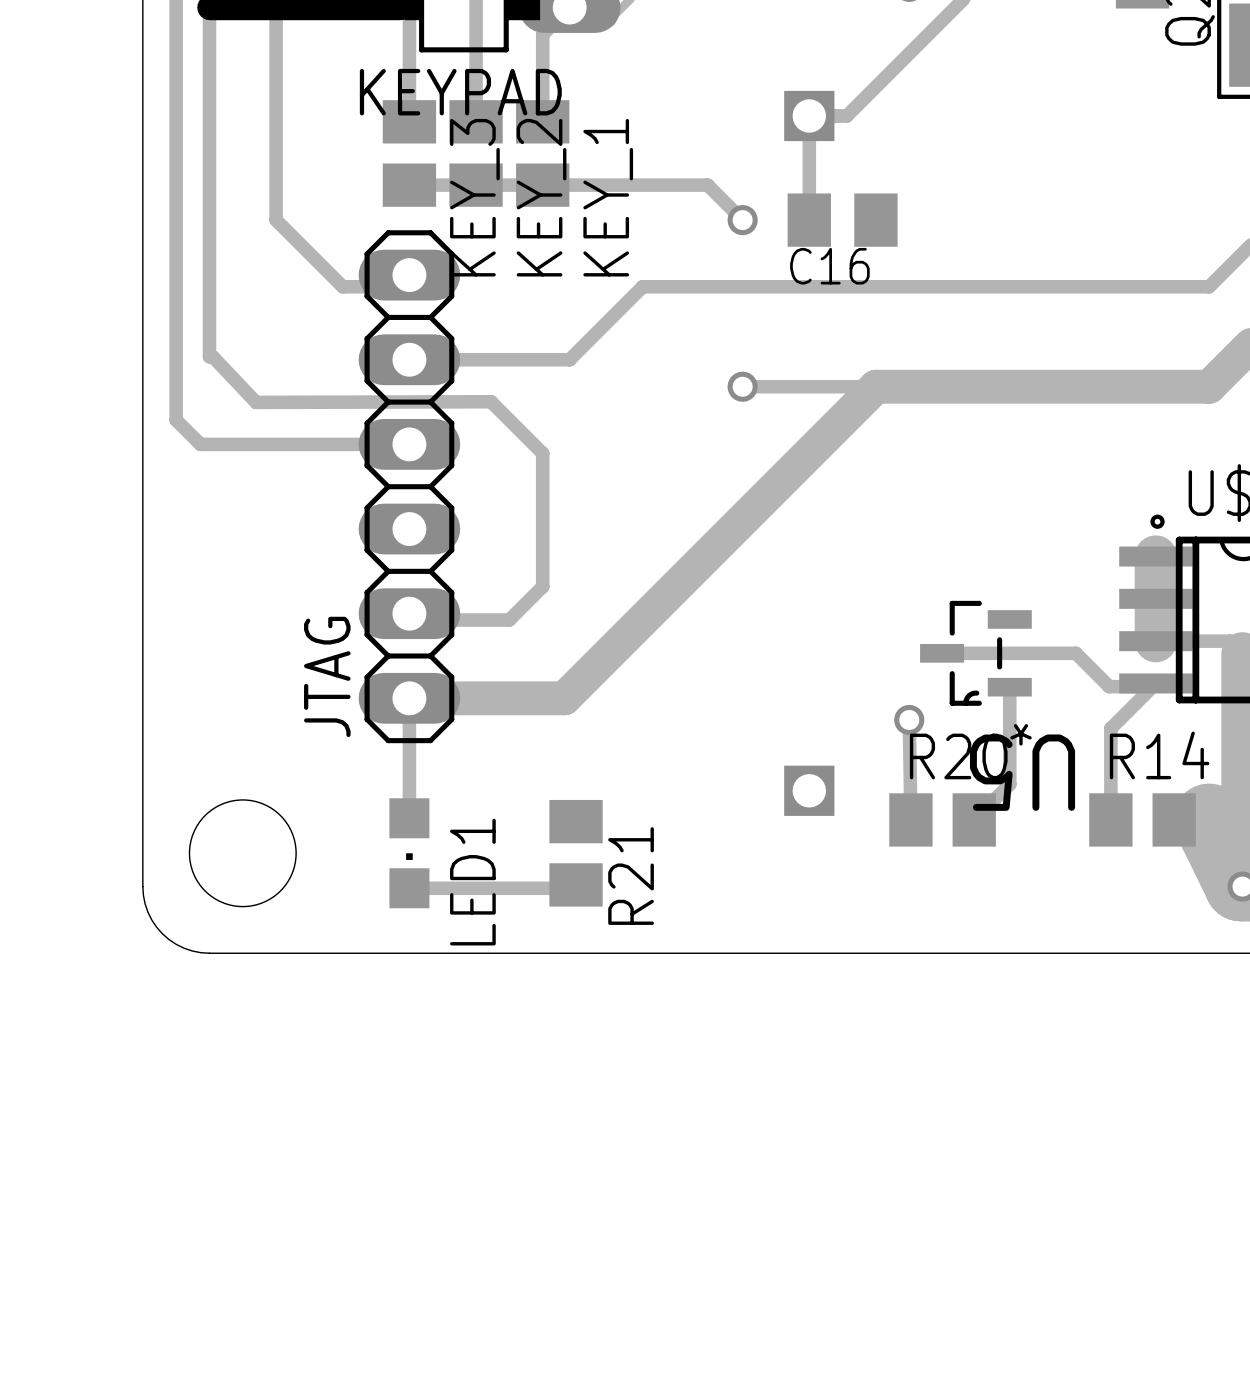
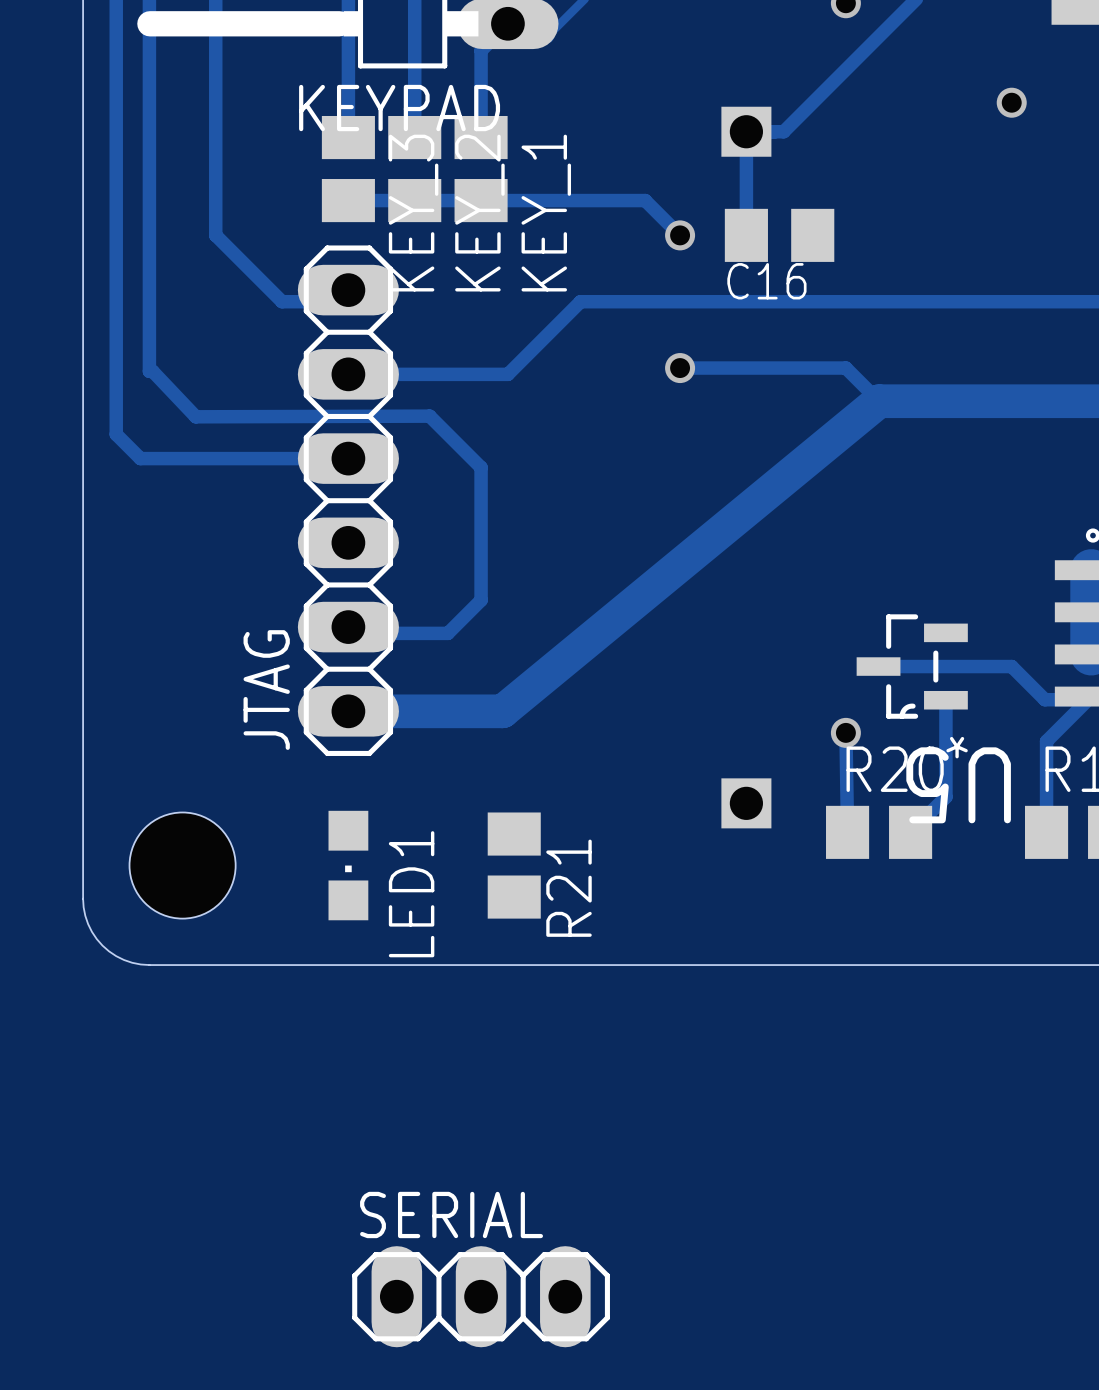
via: none -> (1011, 102)
track: (742, 386) (875, 386) -> none
via position: (742, 386) -> (680, 368)
track: (875, 386) (564, 698) -> (680, 368) (845, 368) (879, 401) (502, 711)
track: (875, 386) (942, 386) -> none
track: (409, 698) (409, 818) -> none
track: (576, 884) (572, 888) (409, 888) -> none
SERIAL: none -> (481, 1296)

